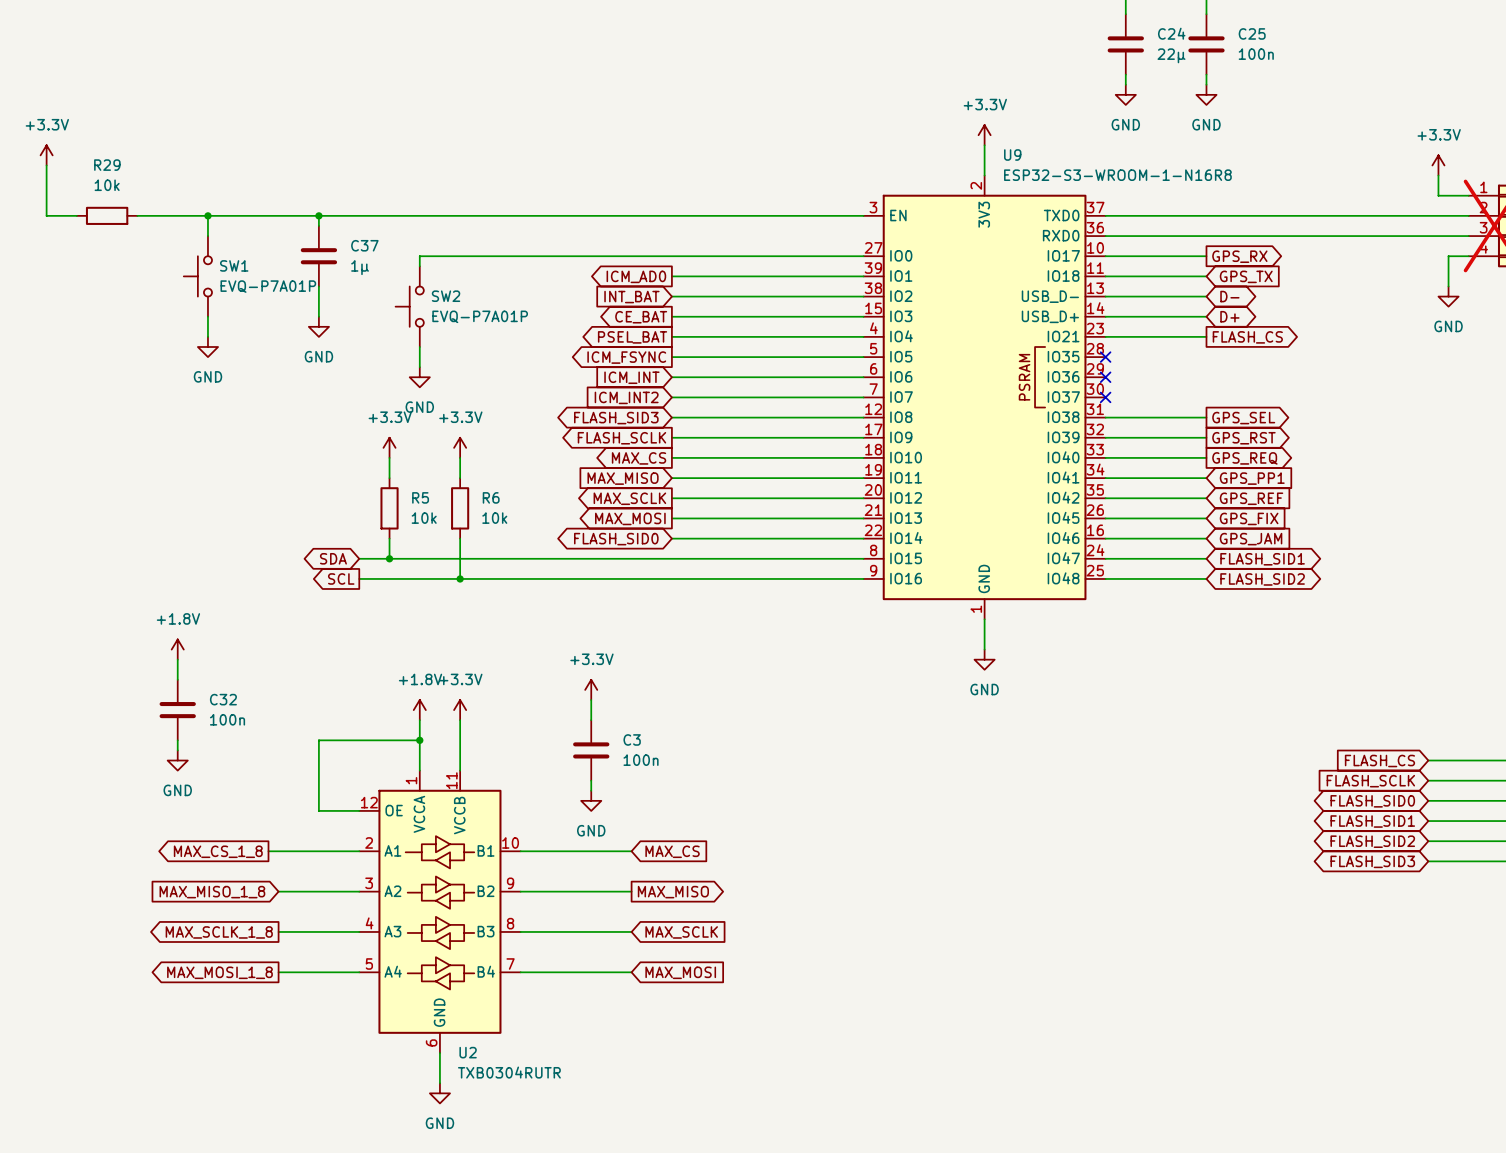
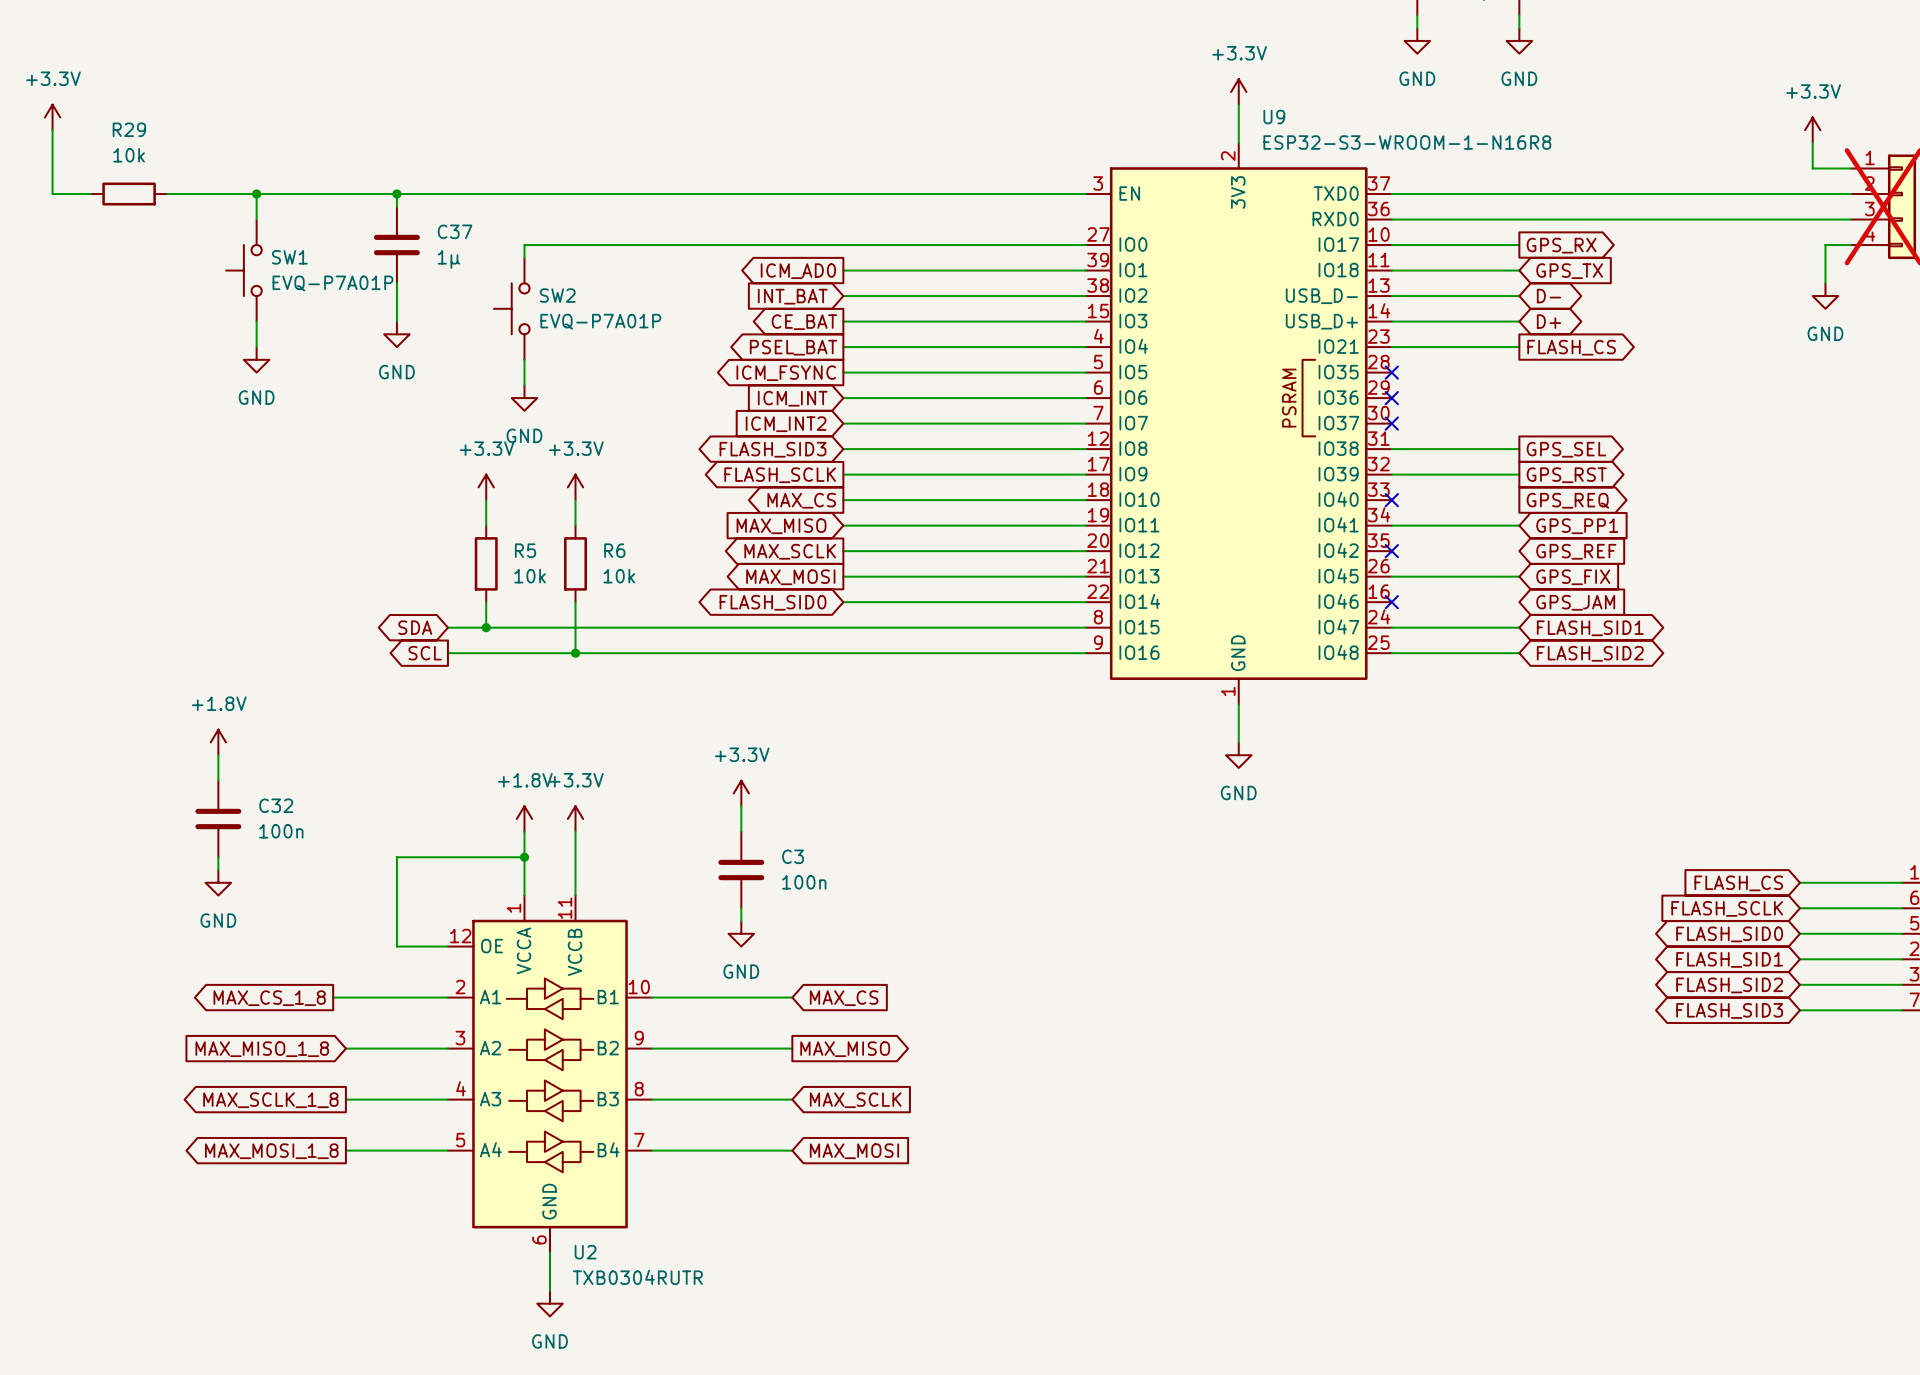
wire: (1105, 457) (1206, 457) -> none
no-connect mark: none -> (1391, 500)
wire: (1105, 498) (1206, 498) -> none
no-connect mark: none -> (1391, 551)
wire: (1105, 538) (1206, 538) -> none
no-connect mark: none -> (1391, 602)

